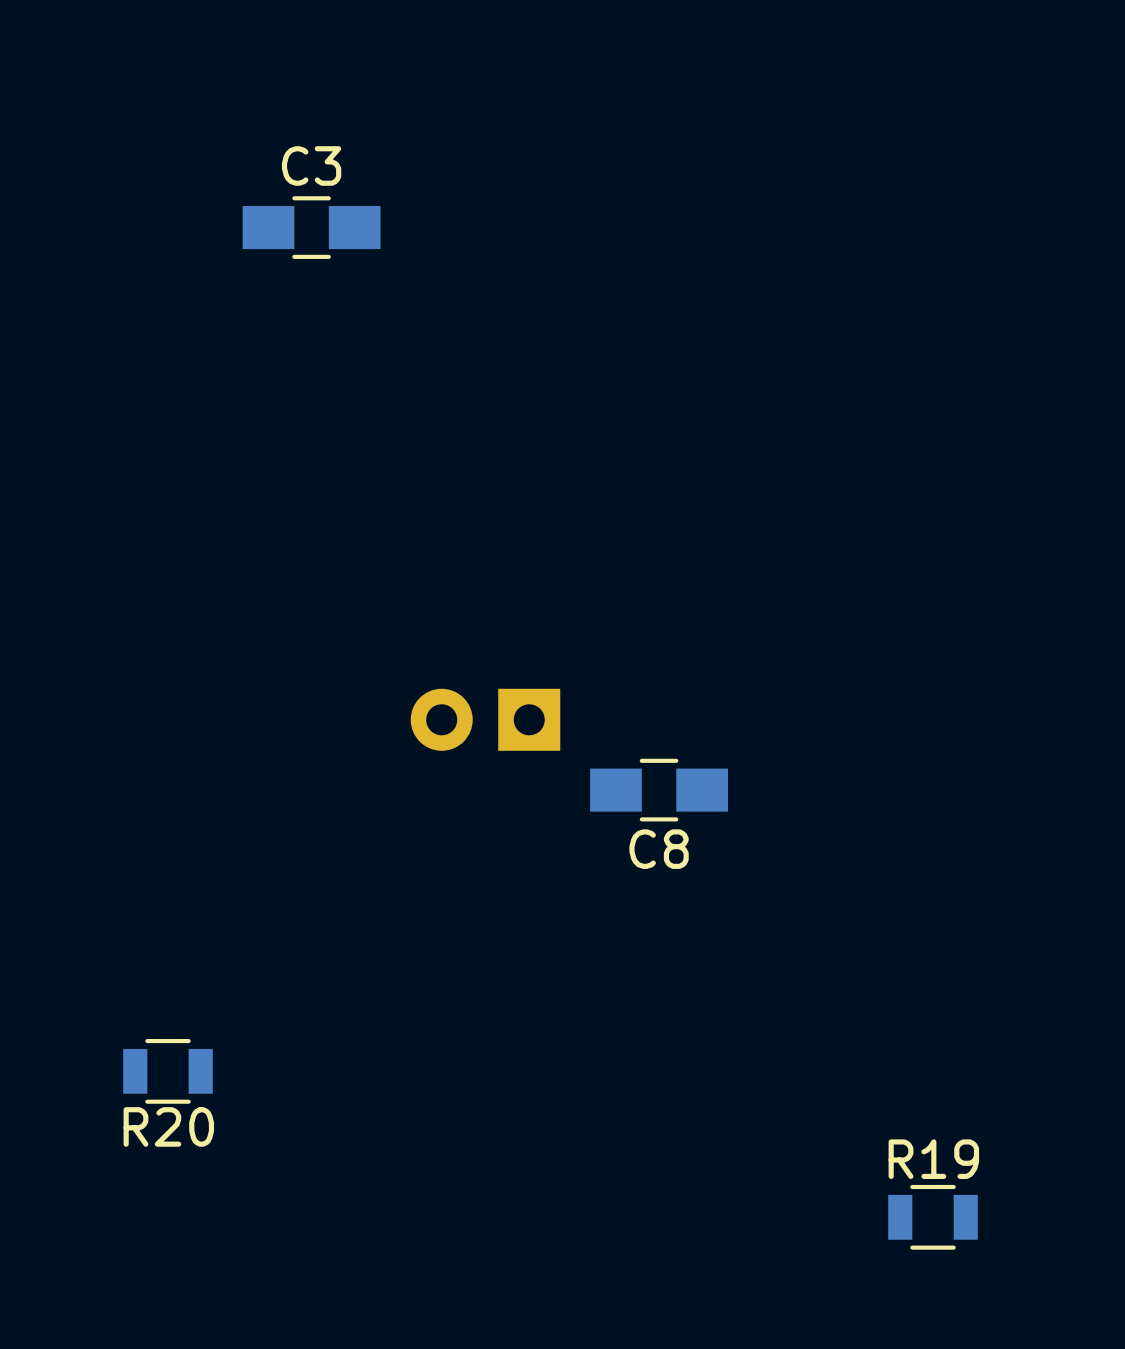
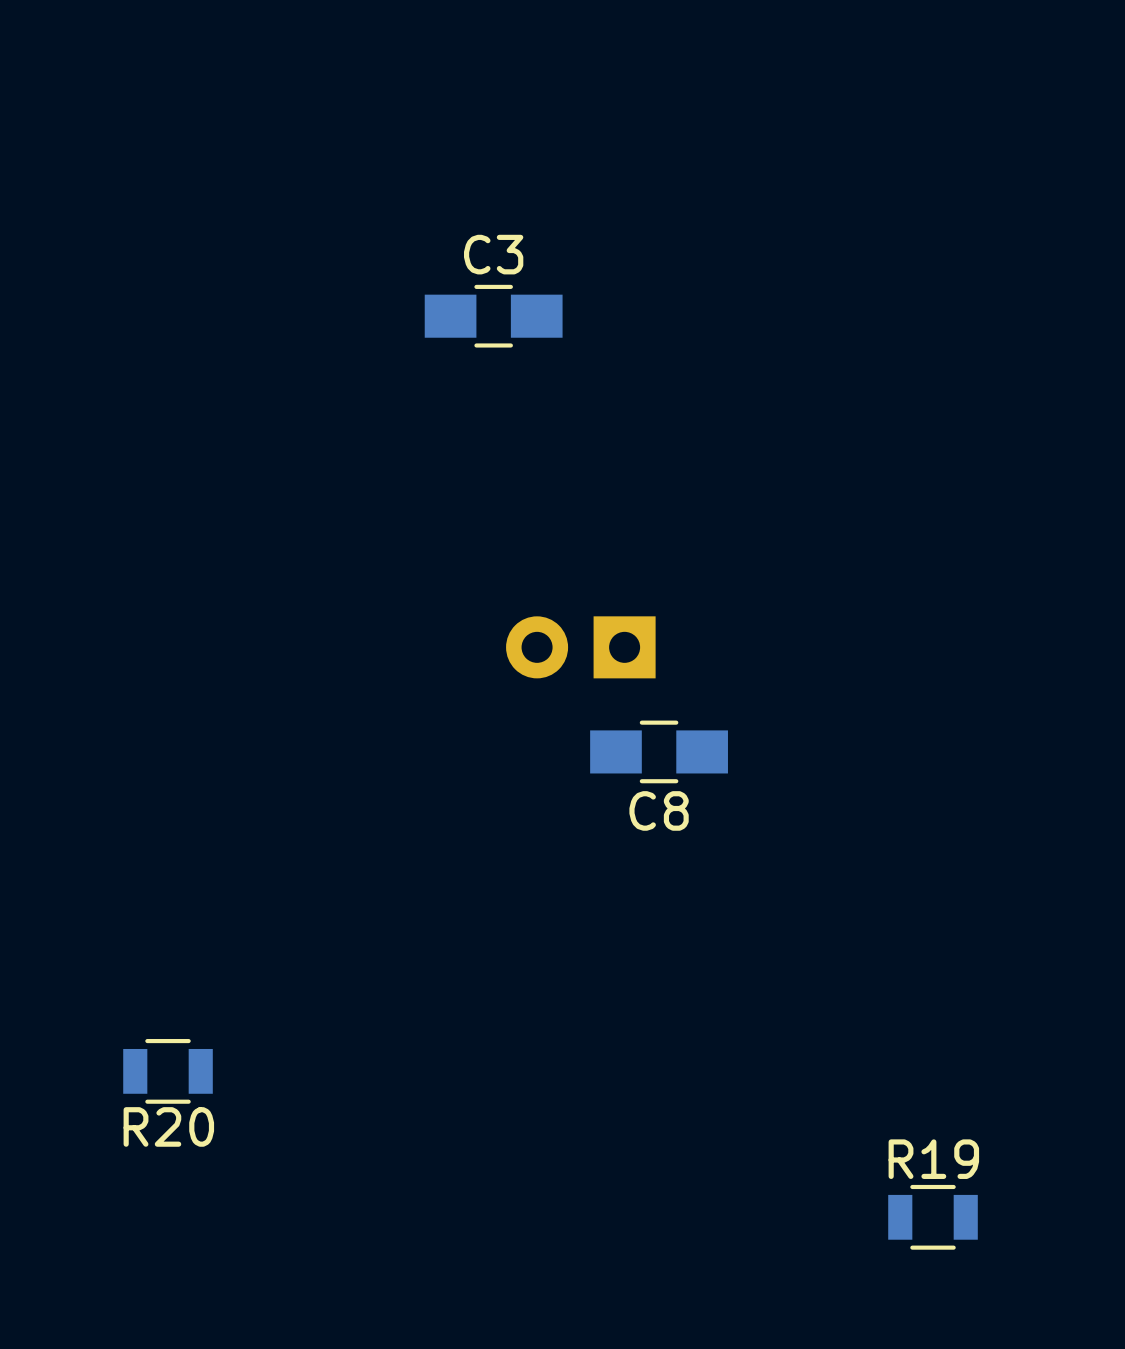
C3 position: (311, 227) -> (493, 316)
part position: (485, 719) -> (580, 647)
C8 position: (659, 790) -> (659, 751)

